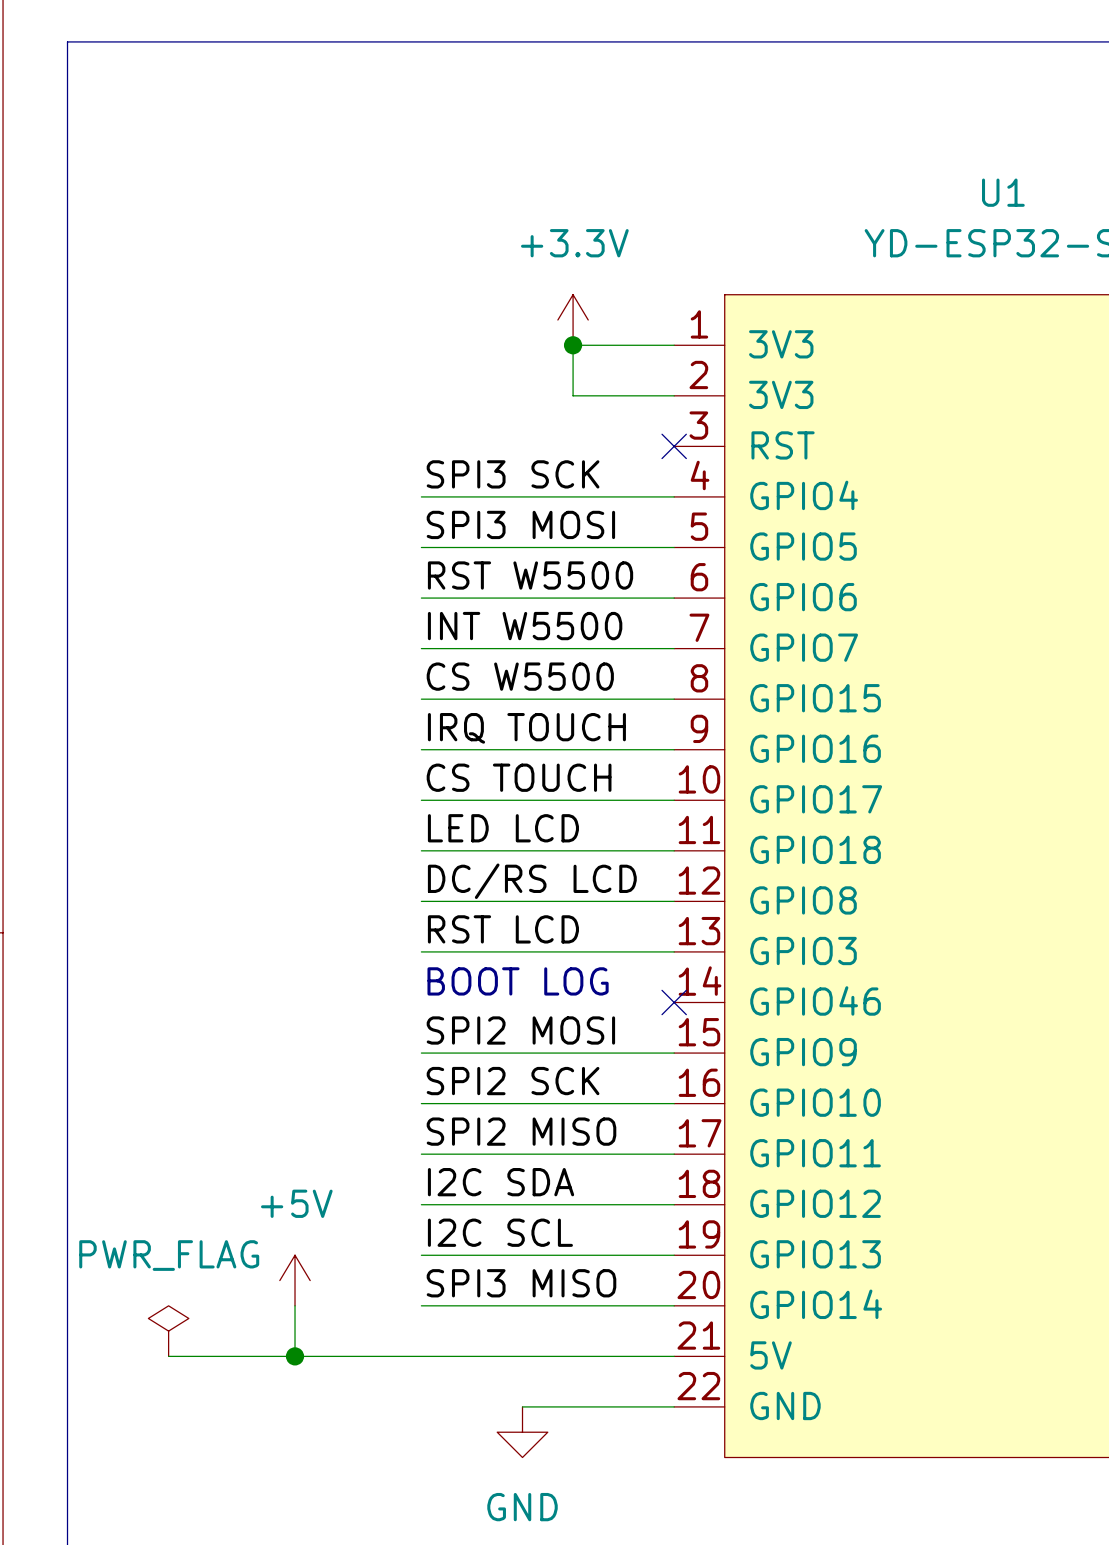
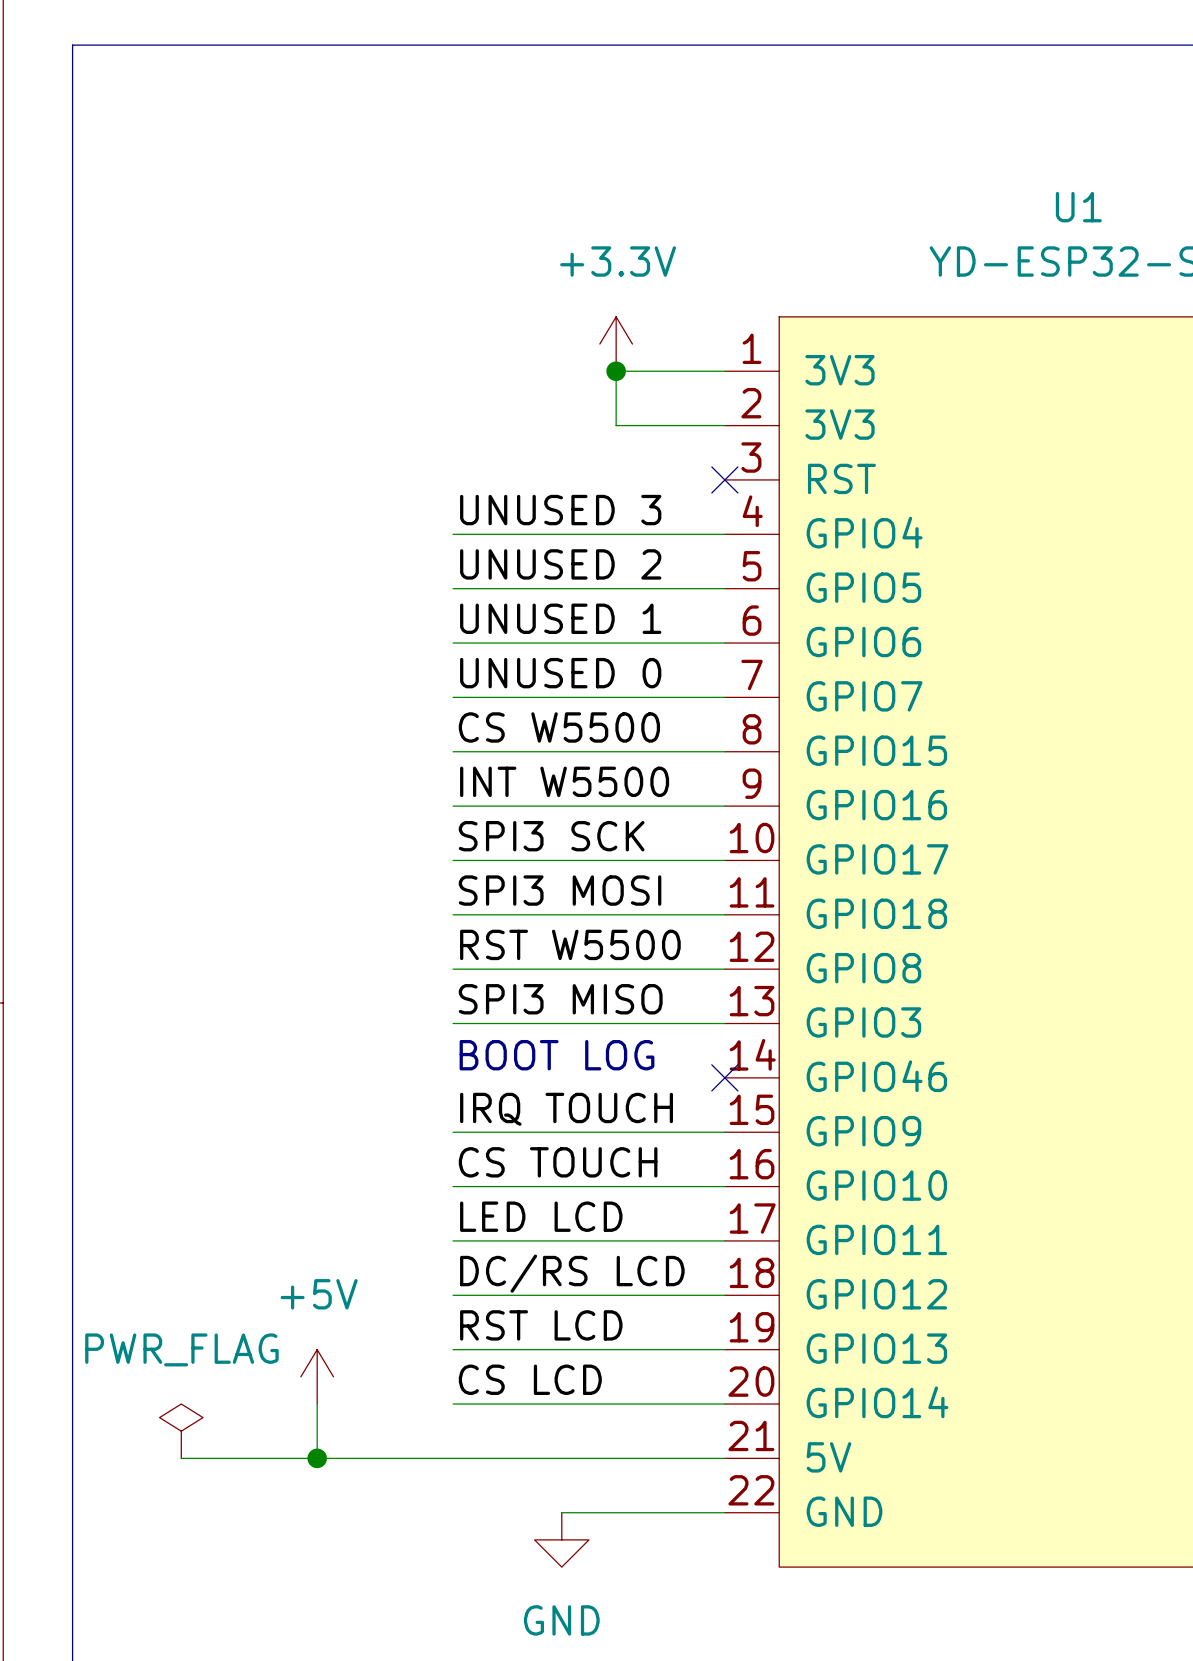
label: SPI3 SCK (513, 474) -> UNUSED 3 (560, 510)
label: SPI3 MOSI (520, 524) -> UNUSED 2 (560, 564)
label: RST W5500 (530, 575) -> UNUSED 1 (560, 618)
label: INT W5500 (525, 626) -> UNUSED 0 (560, 673)
label: IRQ TOUCH (526, 728) -> INT W5500 (564, 781)
label: CS TOUCH (519, 777) -> SPI3 SCK (551, 836)
label: LED LCD (503, 828) -> SPI3 MOSI (560, 890)
label: DC/RS LCD (532, 881) -> RST W5500 (570, 944)
label: RST LCD (503, 929) -> SPI3 MISO (560, 999)
label: SPI2 MOSI (520, 1030) -> IRQ TOUCH (566, 1109)
label: SPI2 SCK (513, 1081) -> CS TOUCH (558, 1162)
label: SPI2 MISO (521, 1131) -> LED LCD (541, 1216)
label: I2C SDA (501, 1182) -> DC/RS LCD (572, 1273)
label: I2C SCL (500, 1232) -> RST LCD (541, 1325)
label: SPI3 MISO (521, 1283) -> CS LCD (530, 1379)

